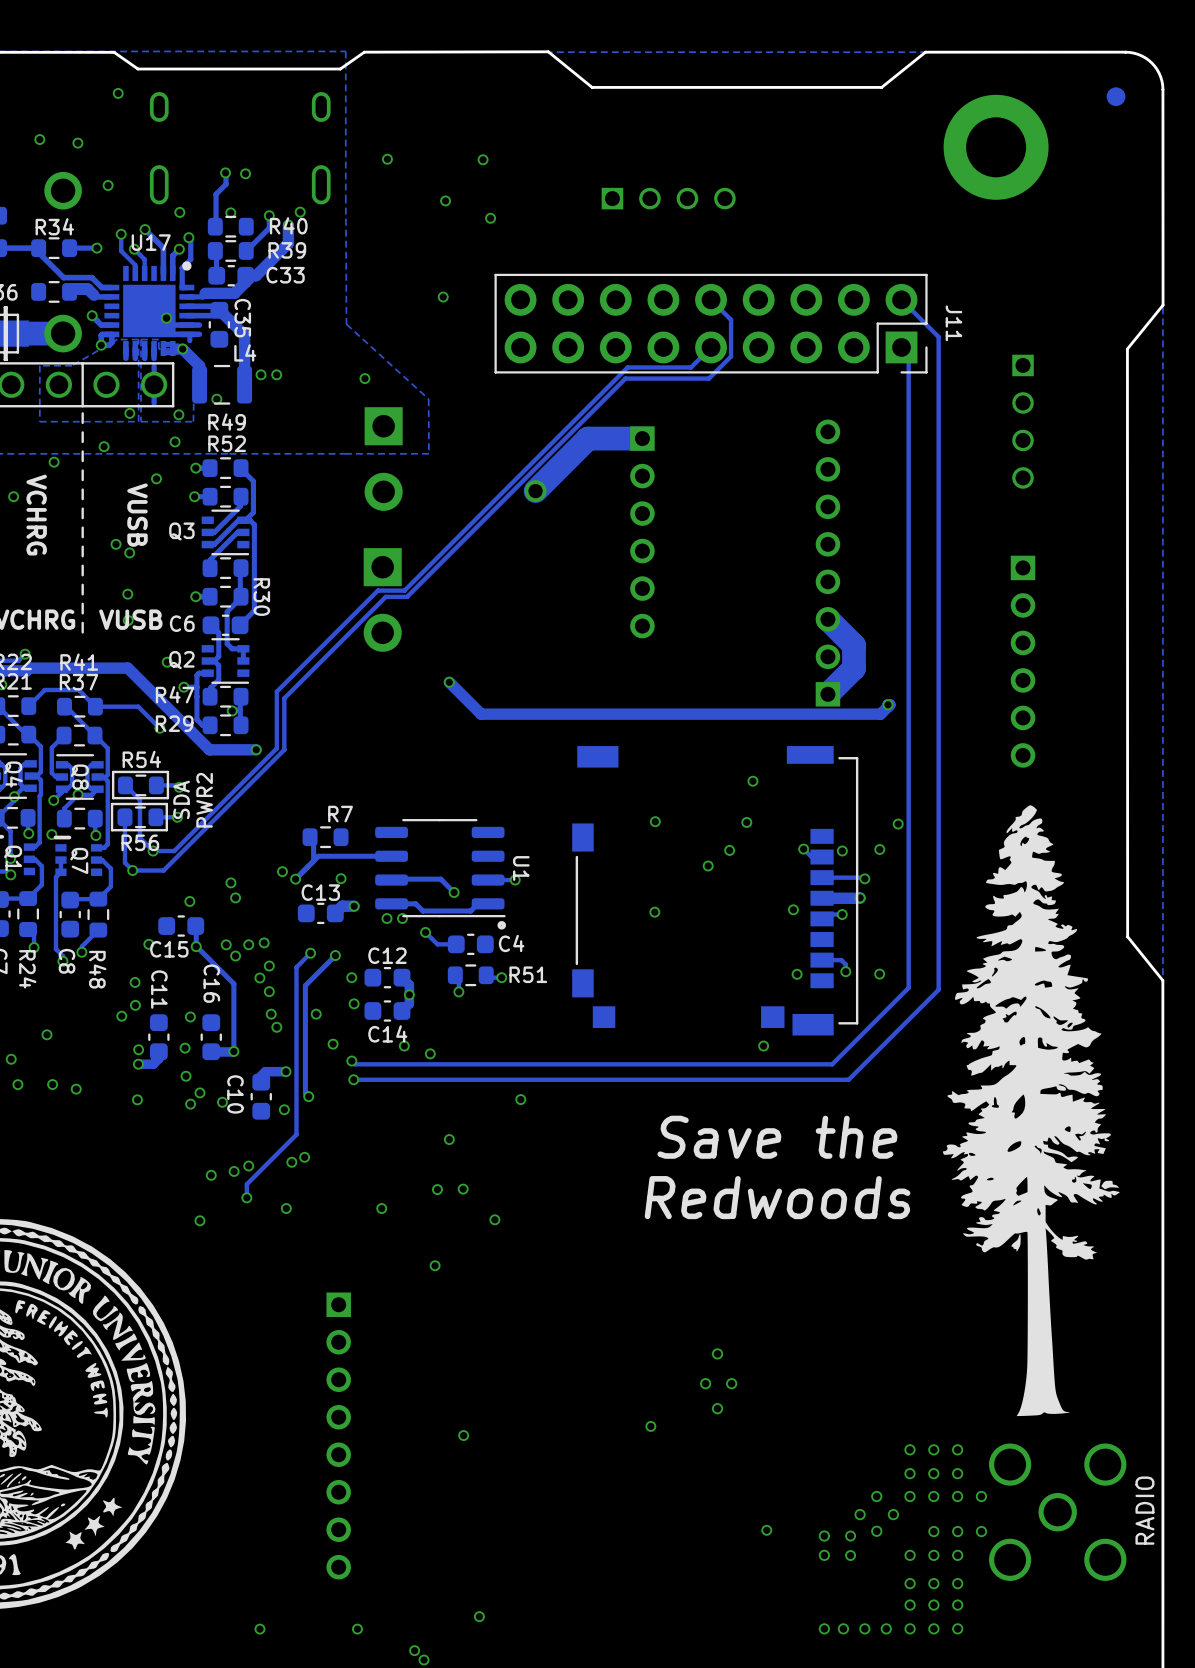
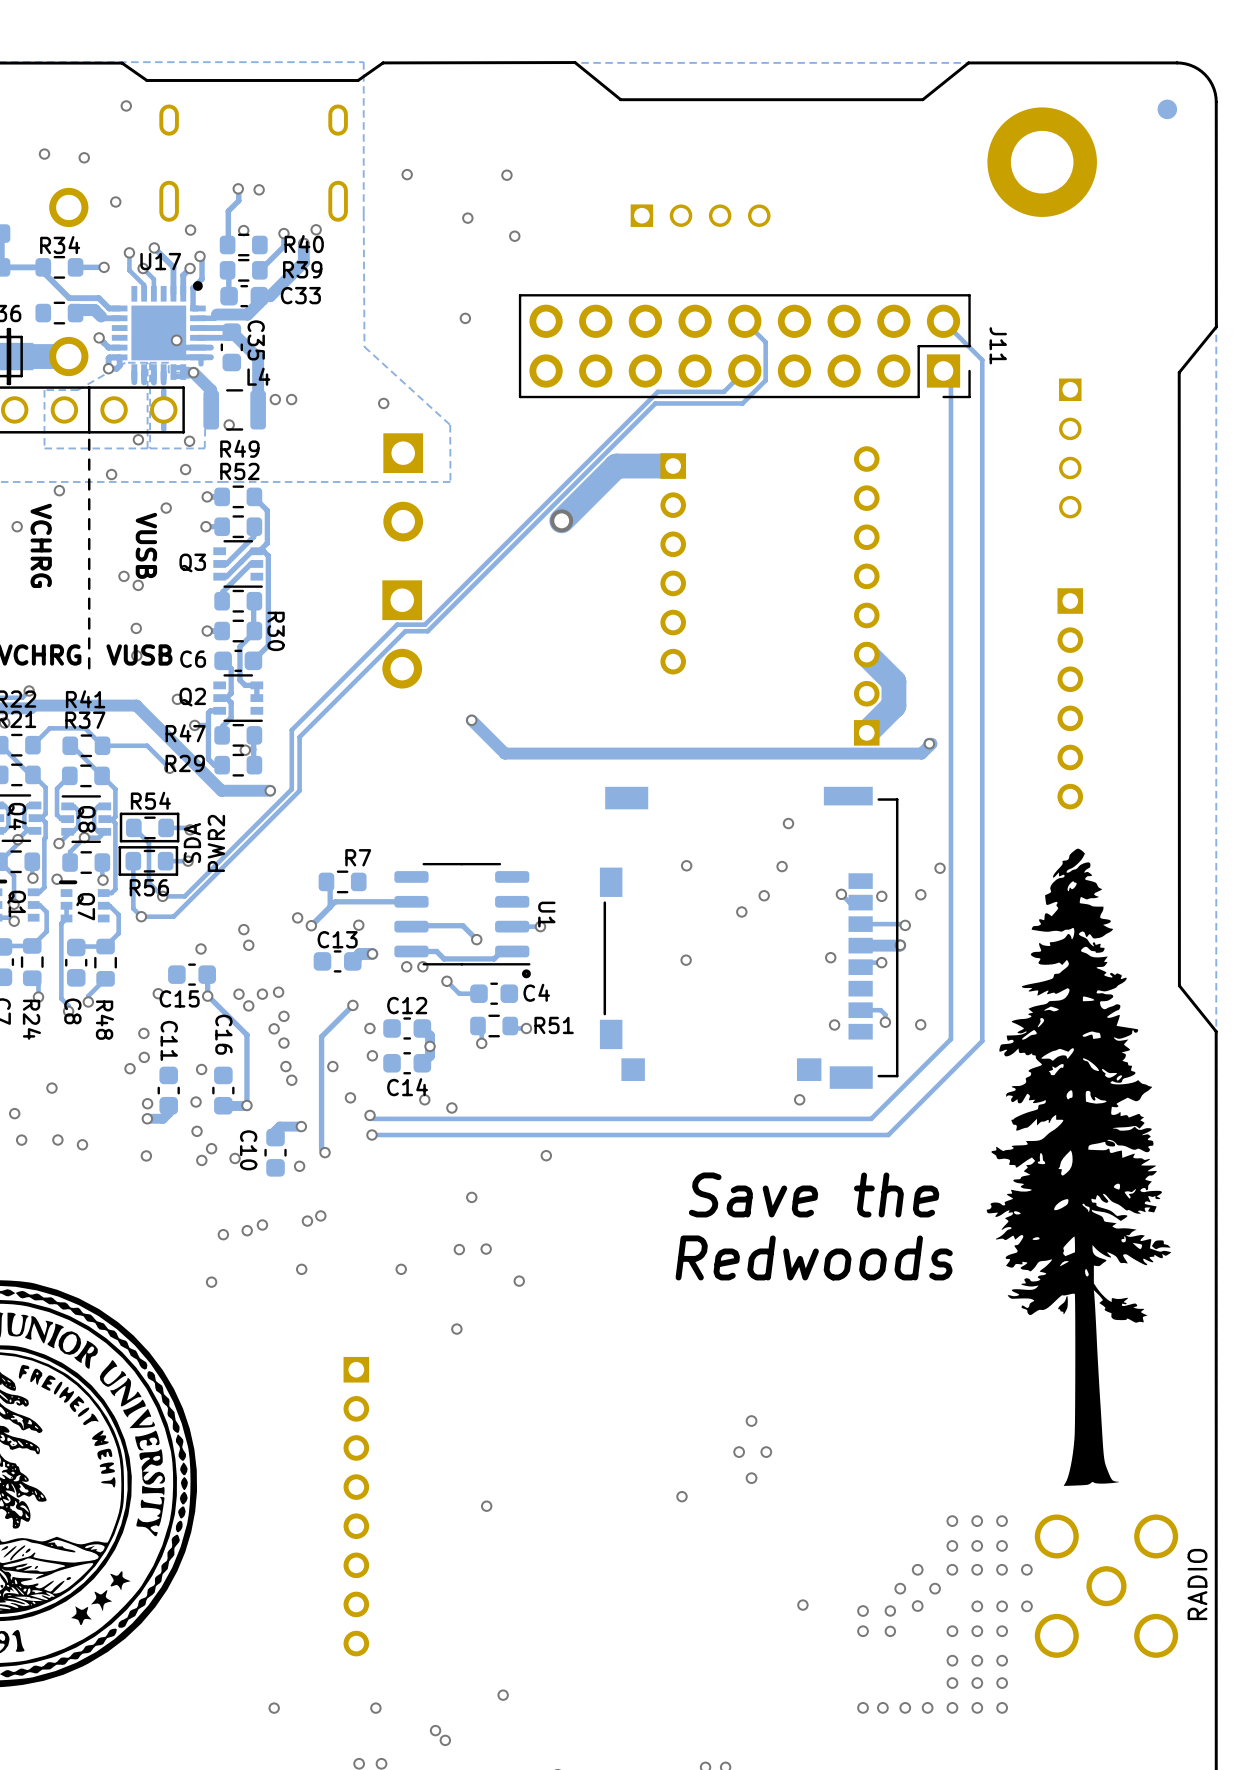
track: (310, 953) (296, 967) (296, 1134) (246, 1184) (246, 1197) -> none
via: (310, 953) -> none
via: (246, 1197) -> none

